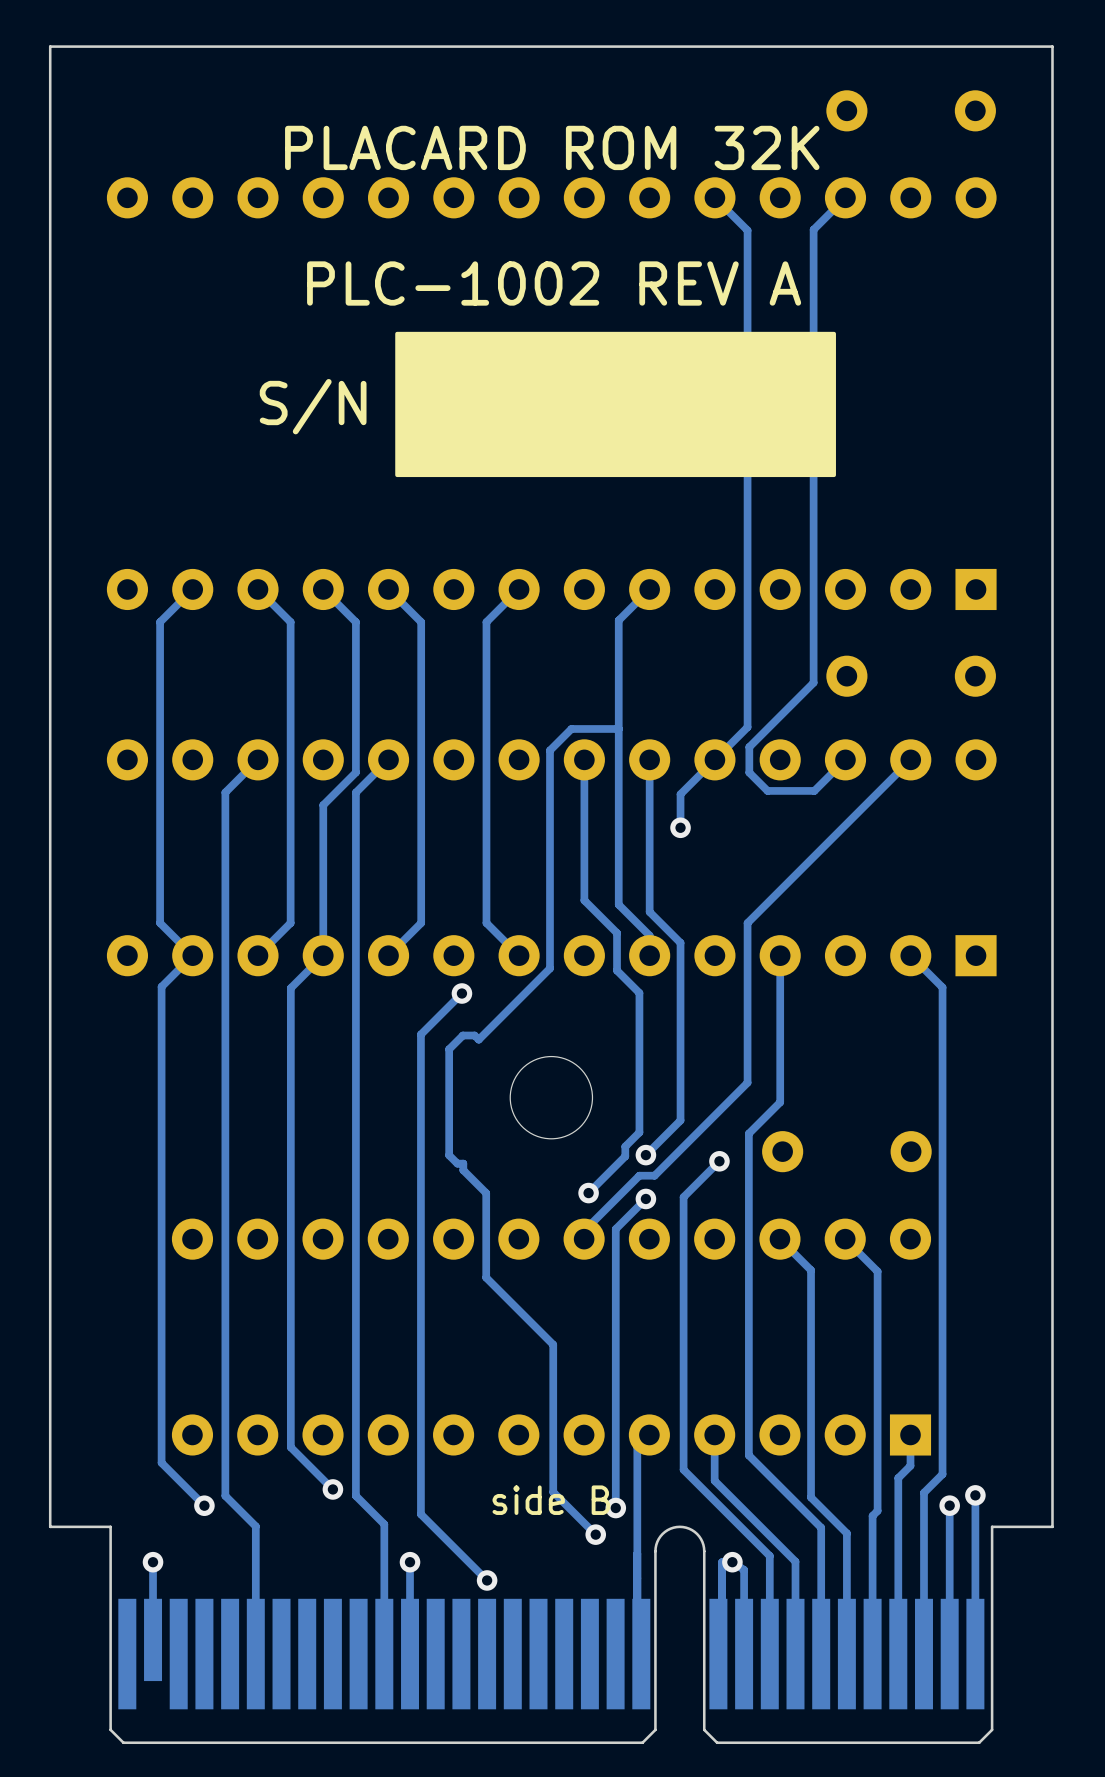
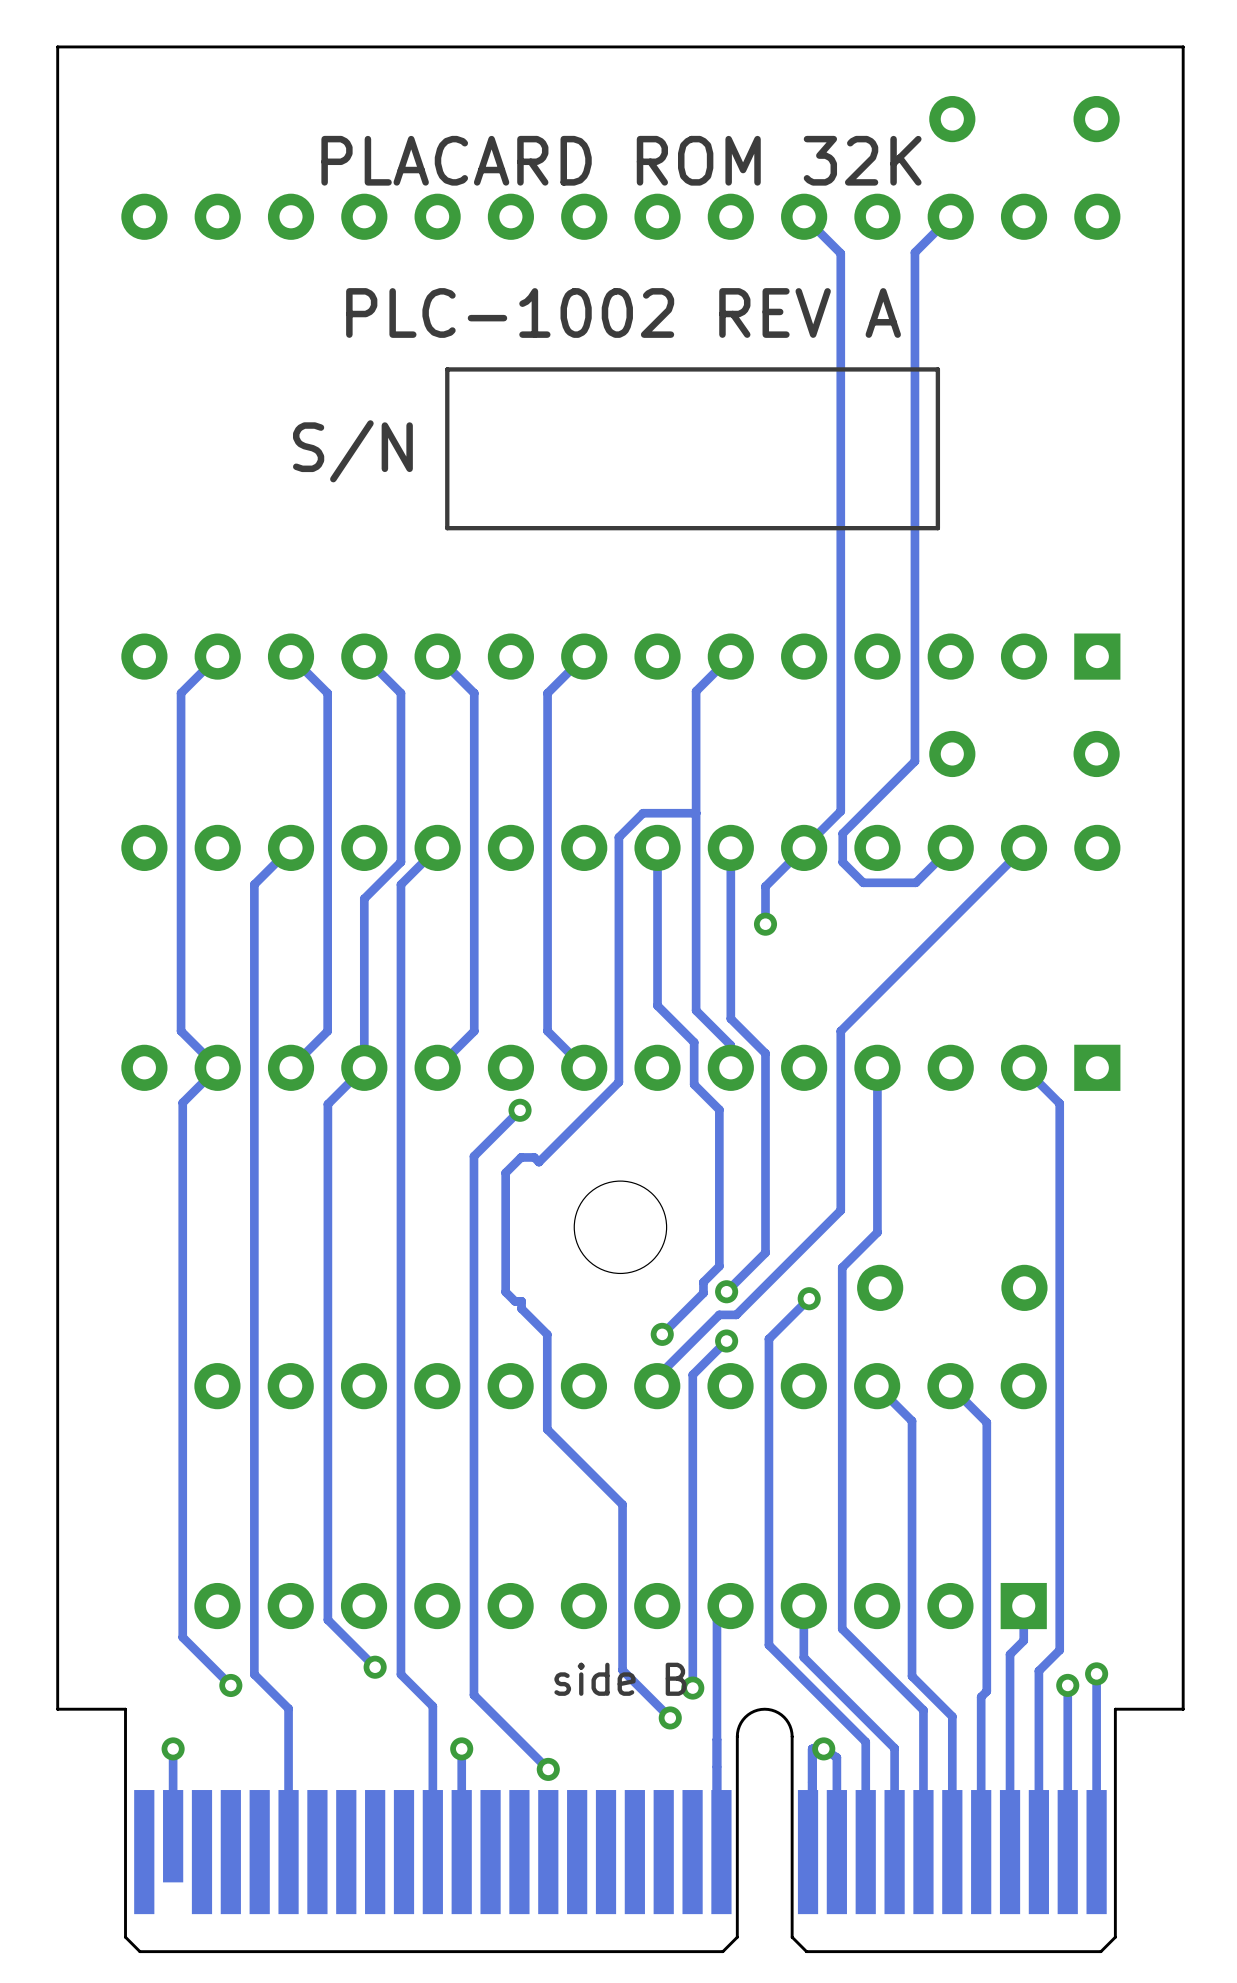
drawing: [395, 331, 836, 478] -> none
line: none -> (937, 369) (447, 369) (447, 528) (937, 528) (937, 369)

